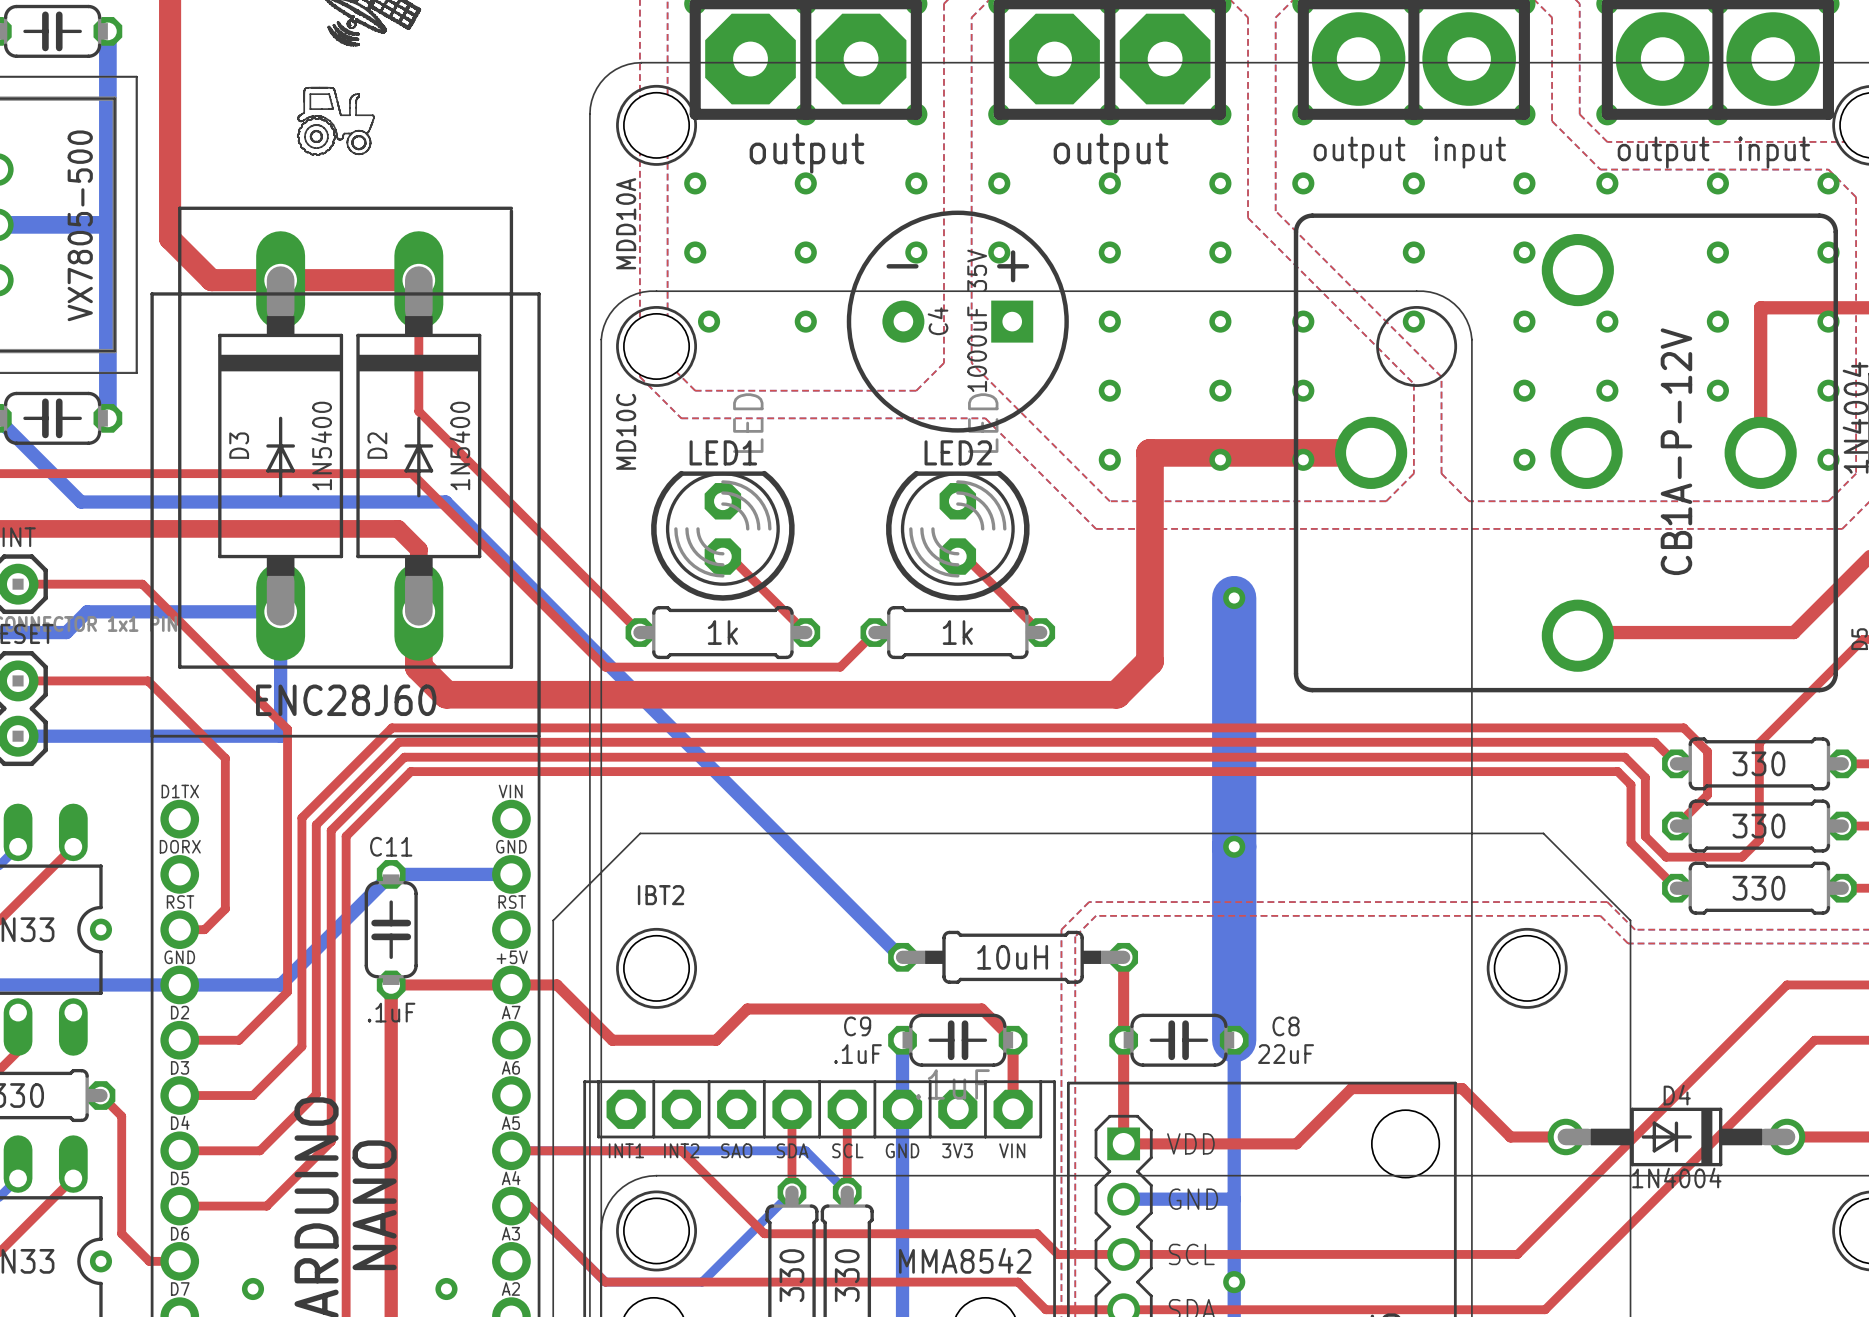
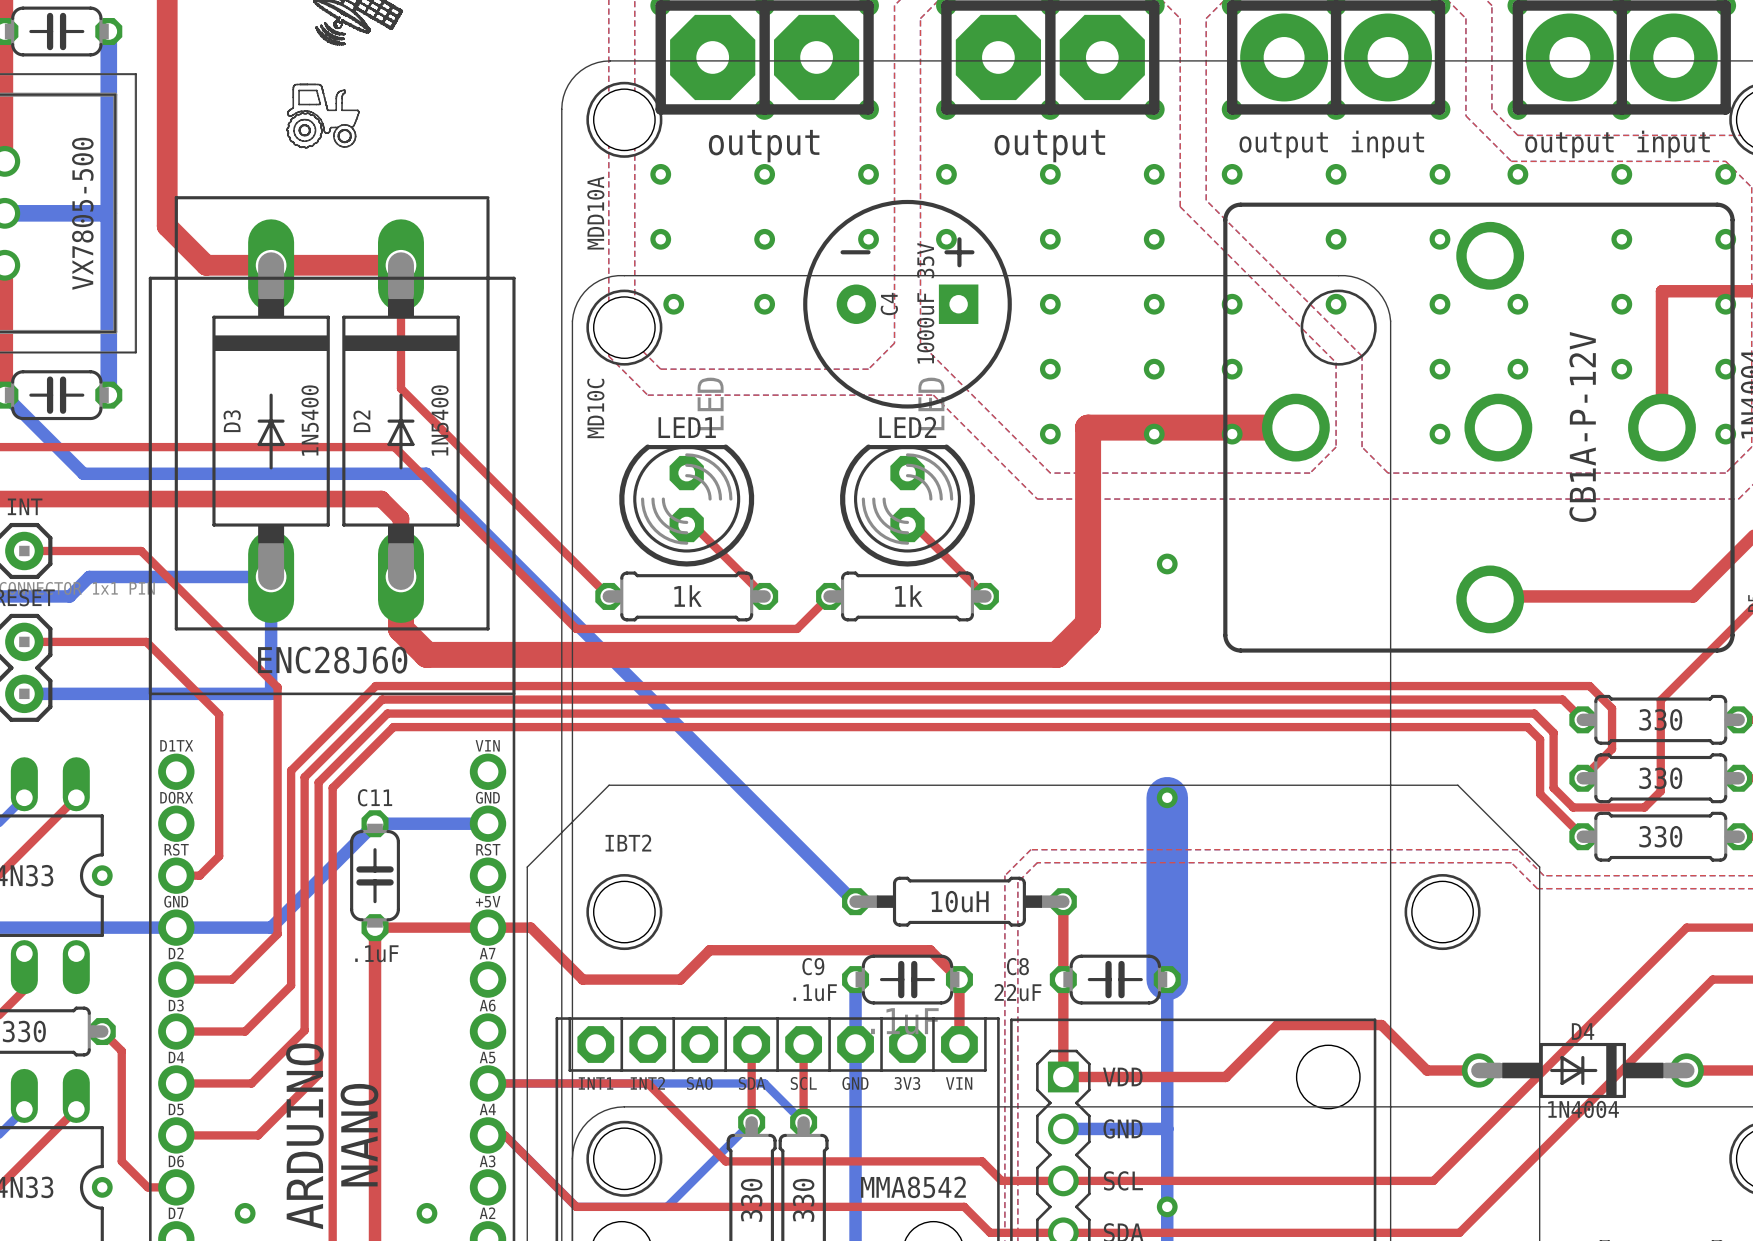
bottom track: (1234, 598) (1234, 846) -> none
C8 name position: C8 (1286, 1026) -> C8 (1017, 966)
C8 value position: 22uF (1286, 1054) -> 22uF (1018, 992)

